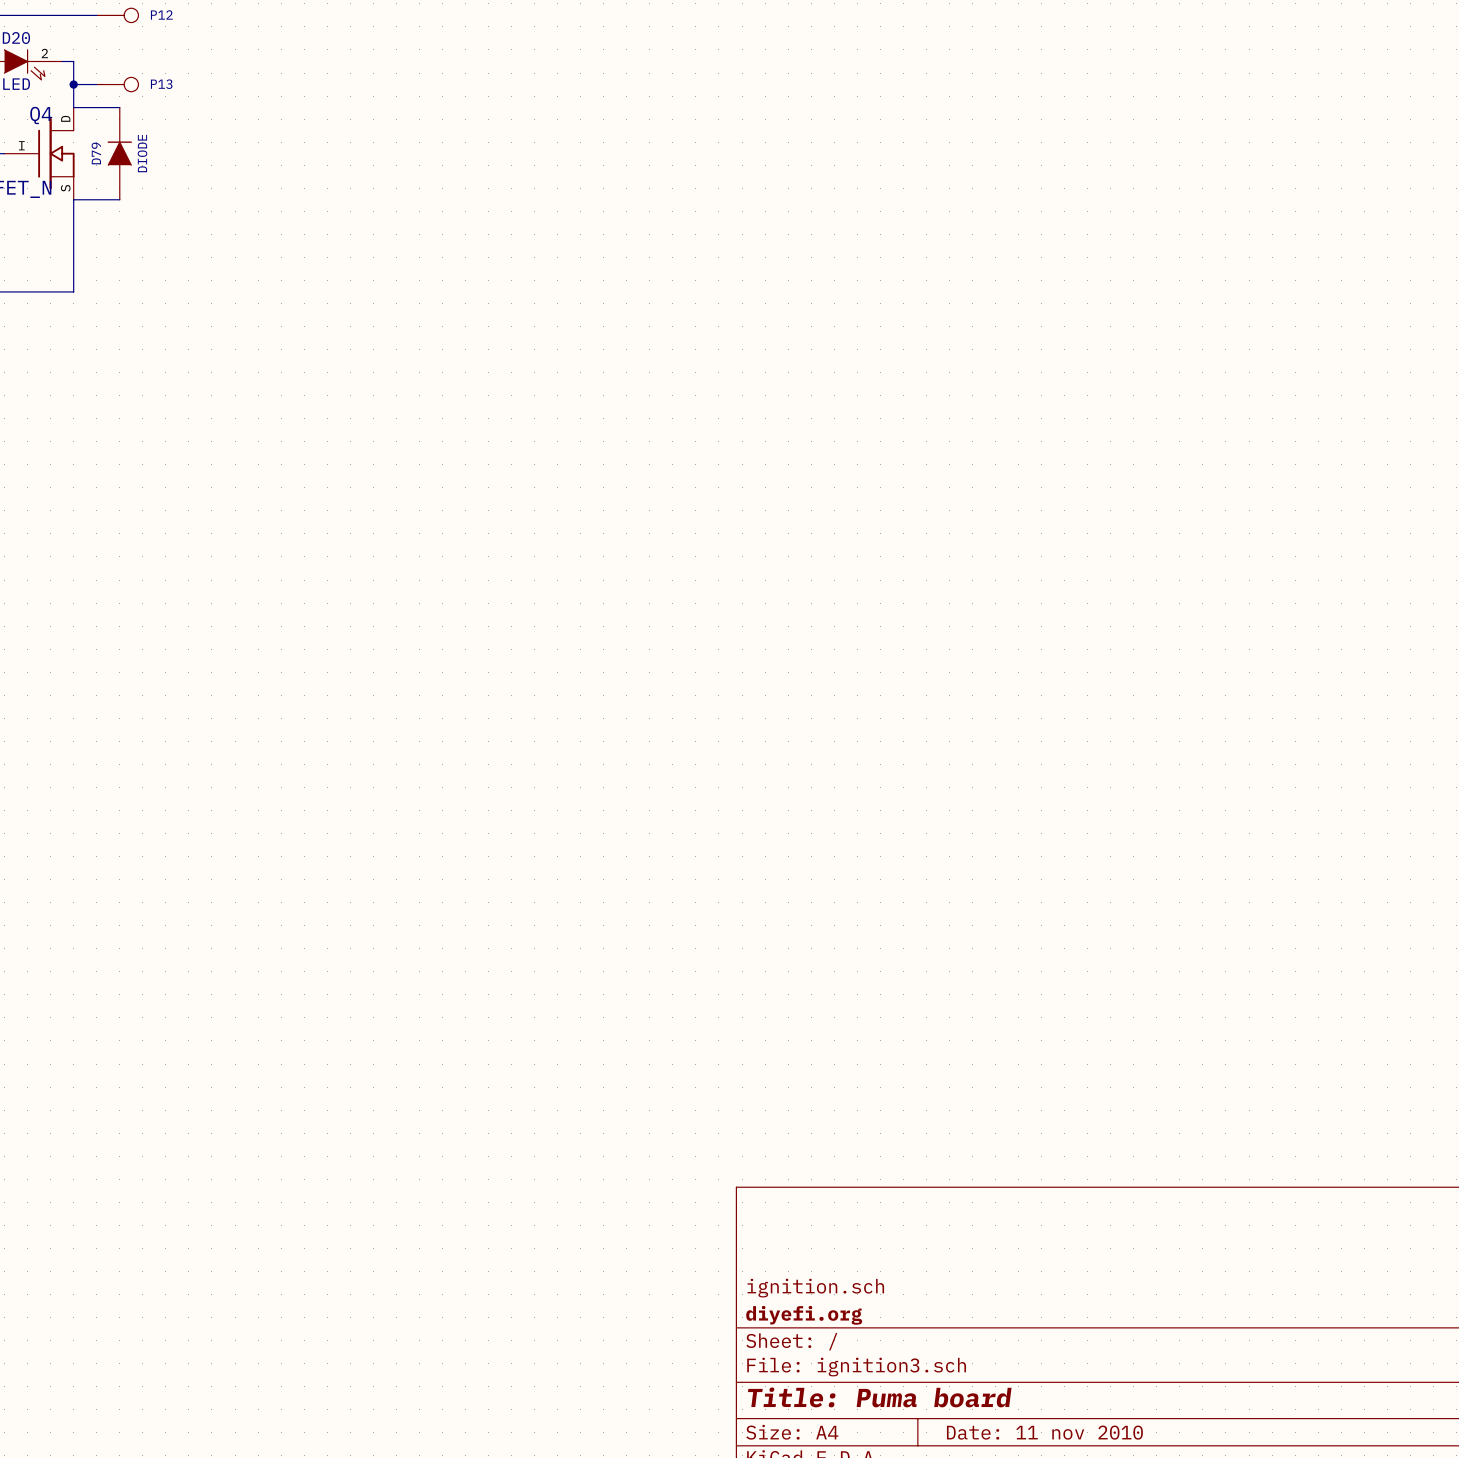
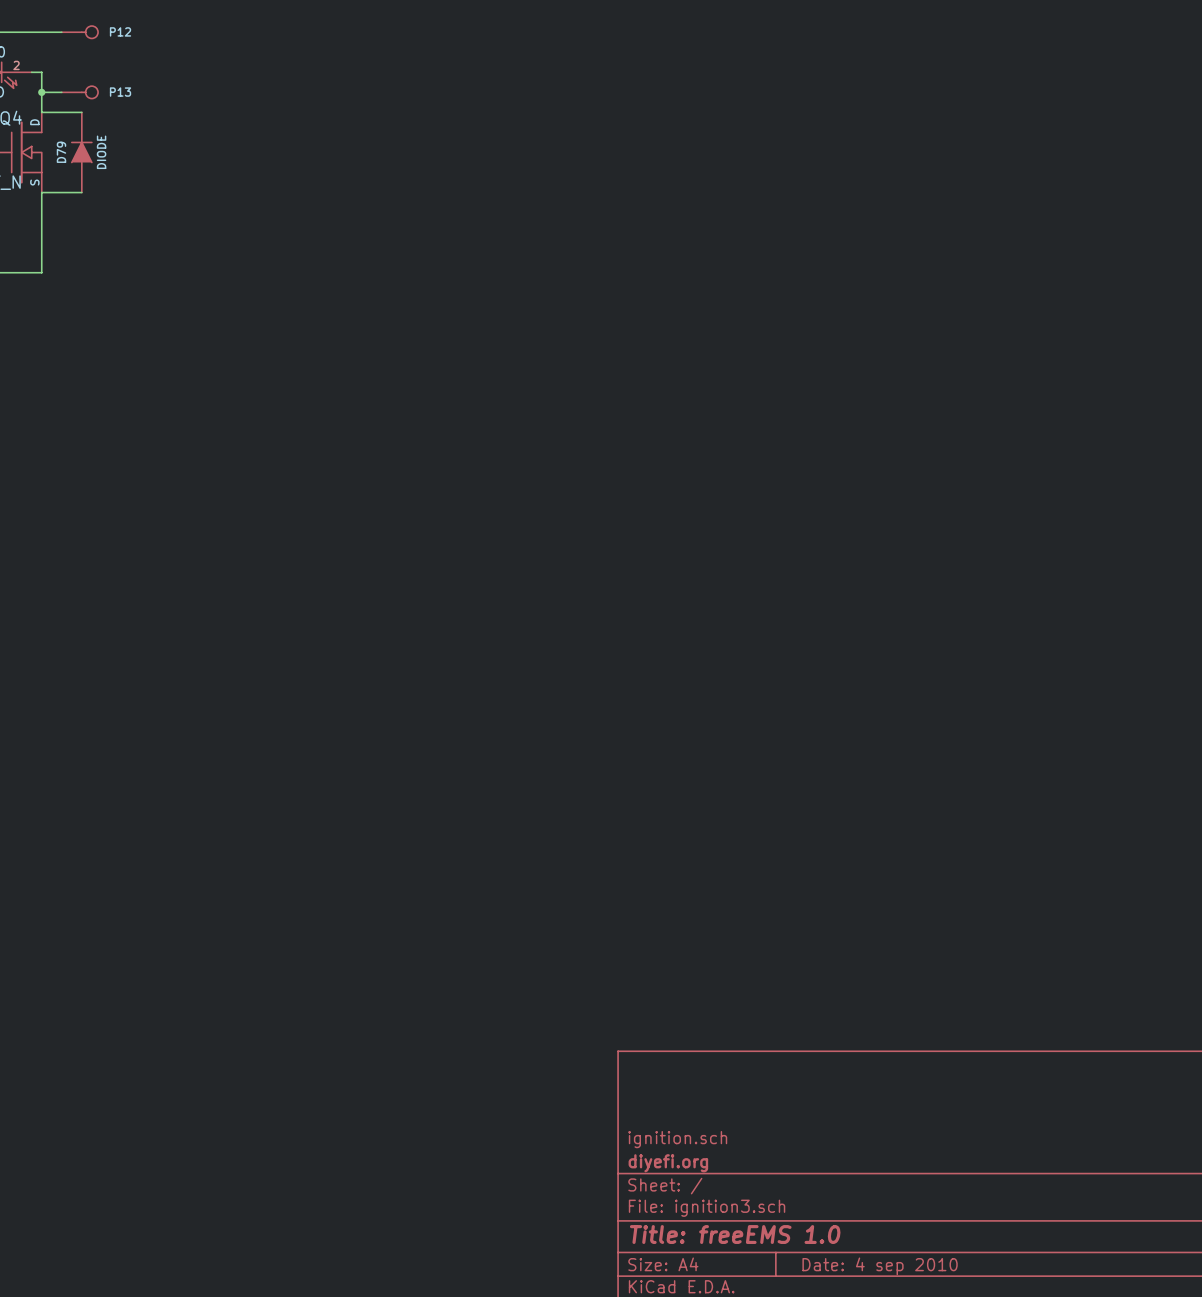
title block: Title: Puma board (879, 1397) -> Title: freeEMS 1.0 (735, 1234)
title block: Date: 11 nov 2010 (1044, 1432) -> Date: 4 sep 2010 (880, 1266)

